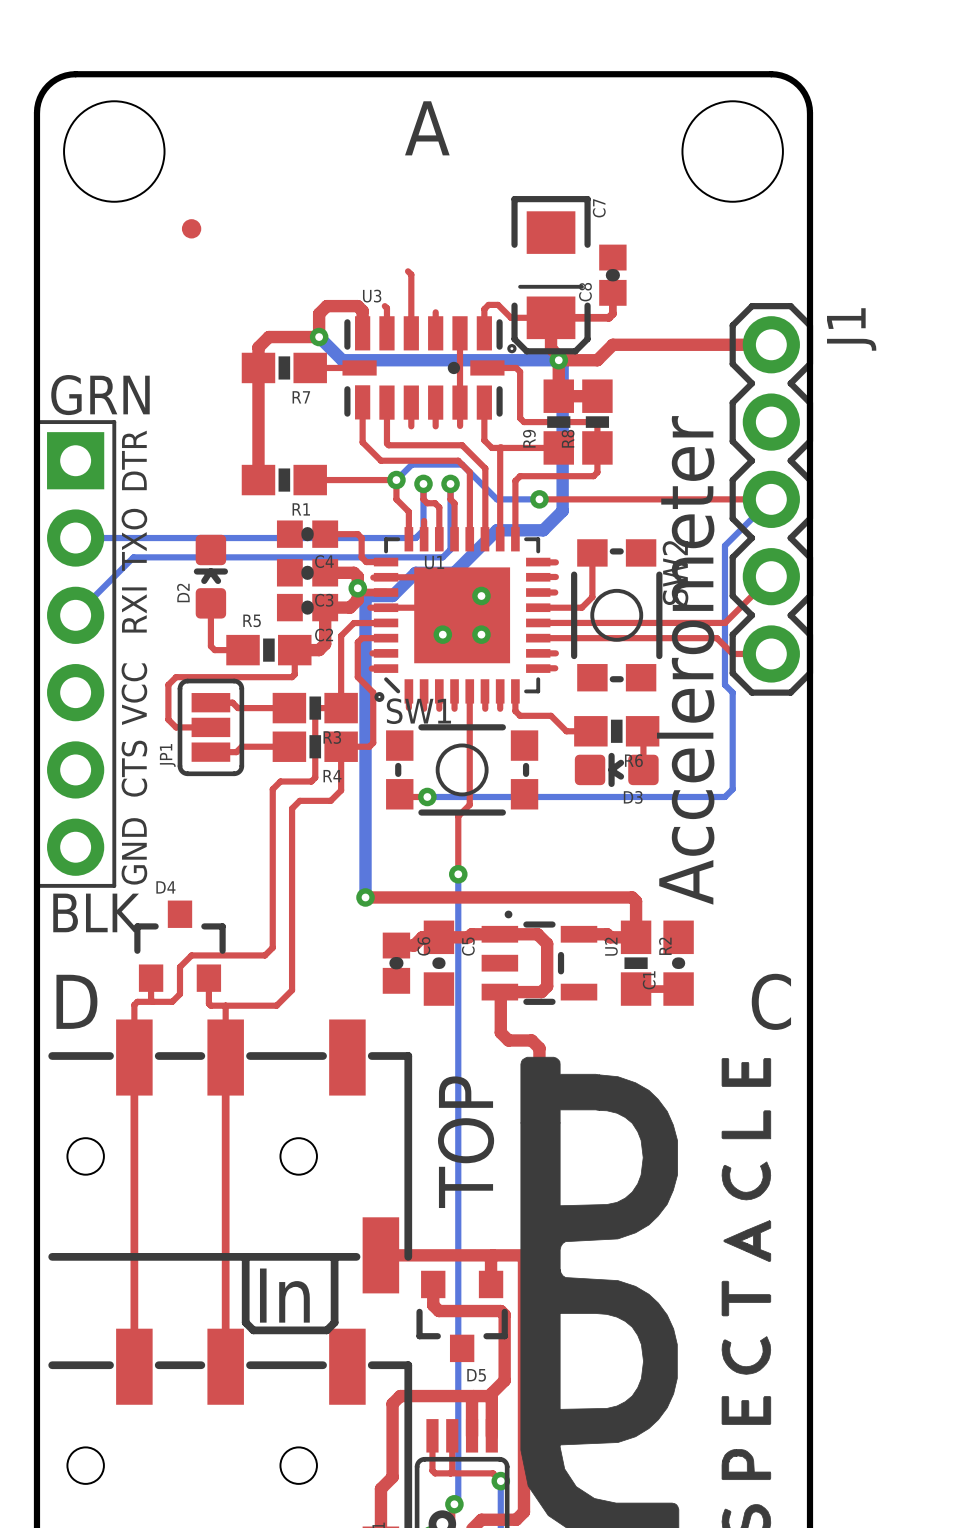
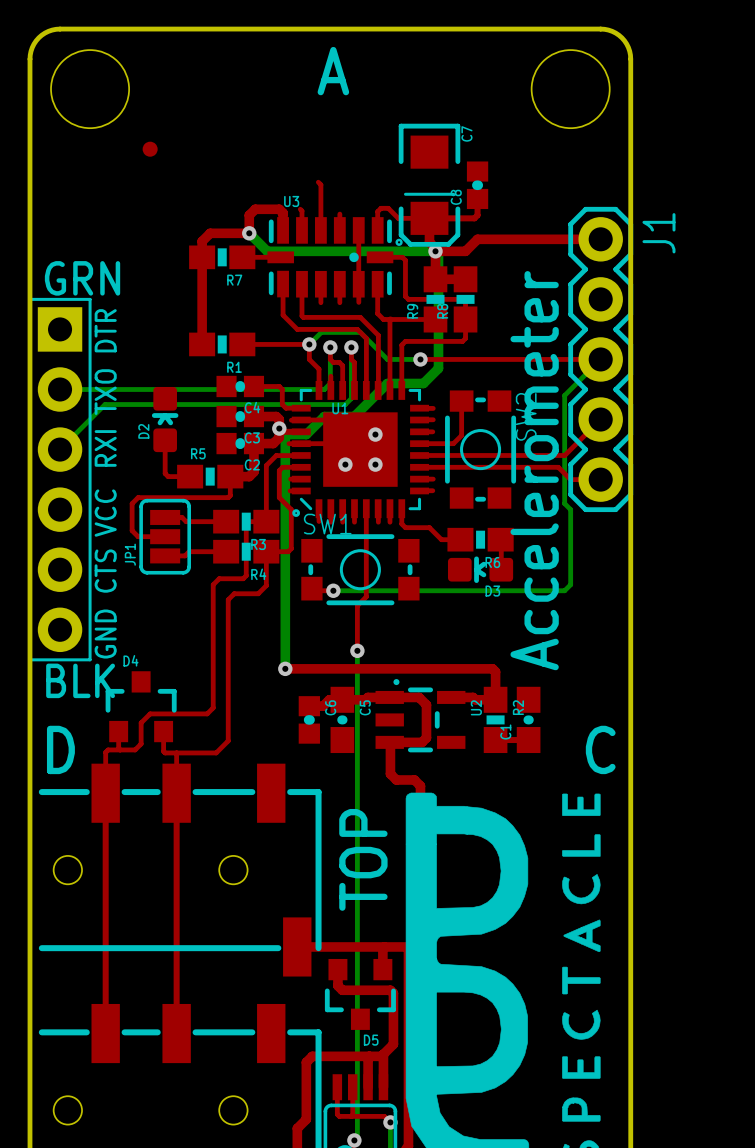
line: (245, 1256) (245, 1322) (253, 1330) (326, 1330) (334, 1322) (334, 1256) -> none
text: In (284, 1295) -> none

